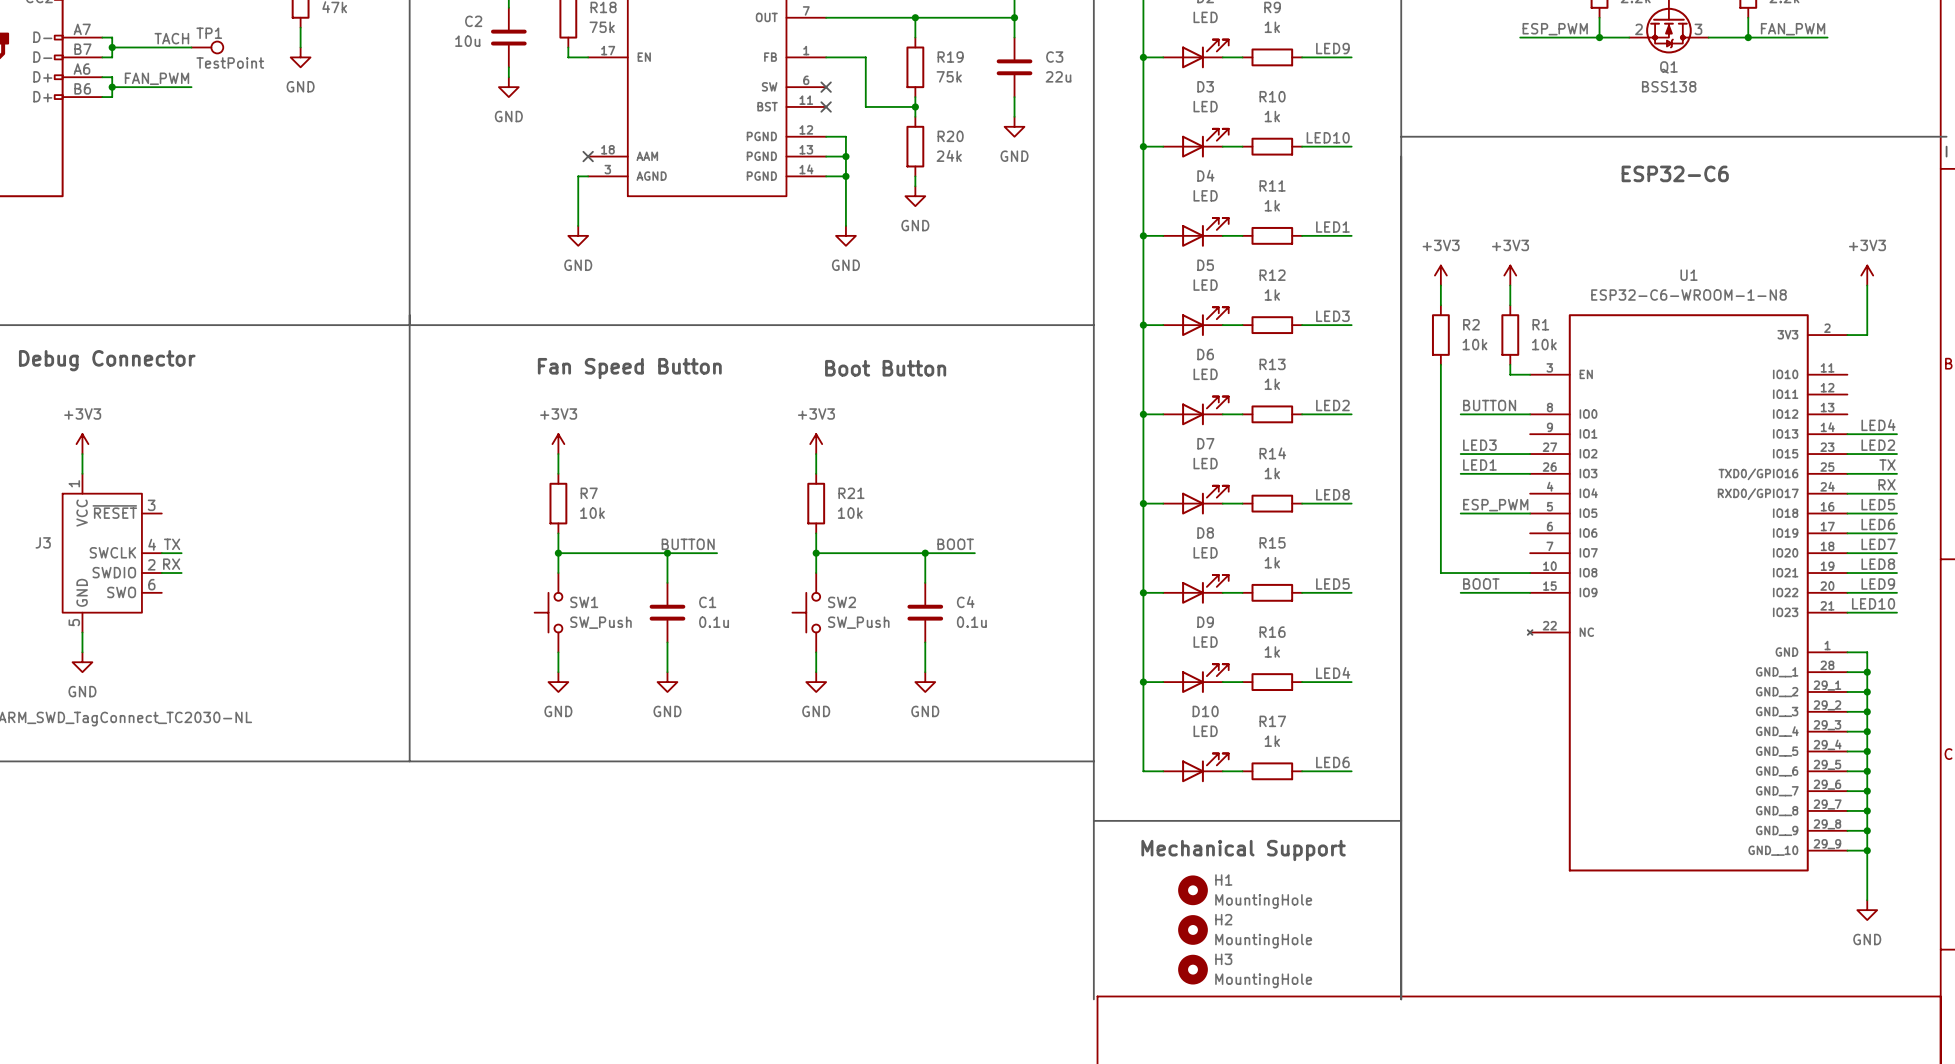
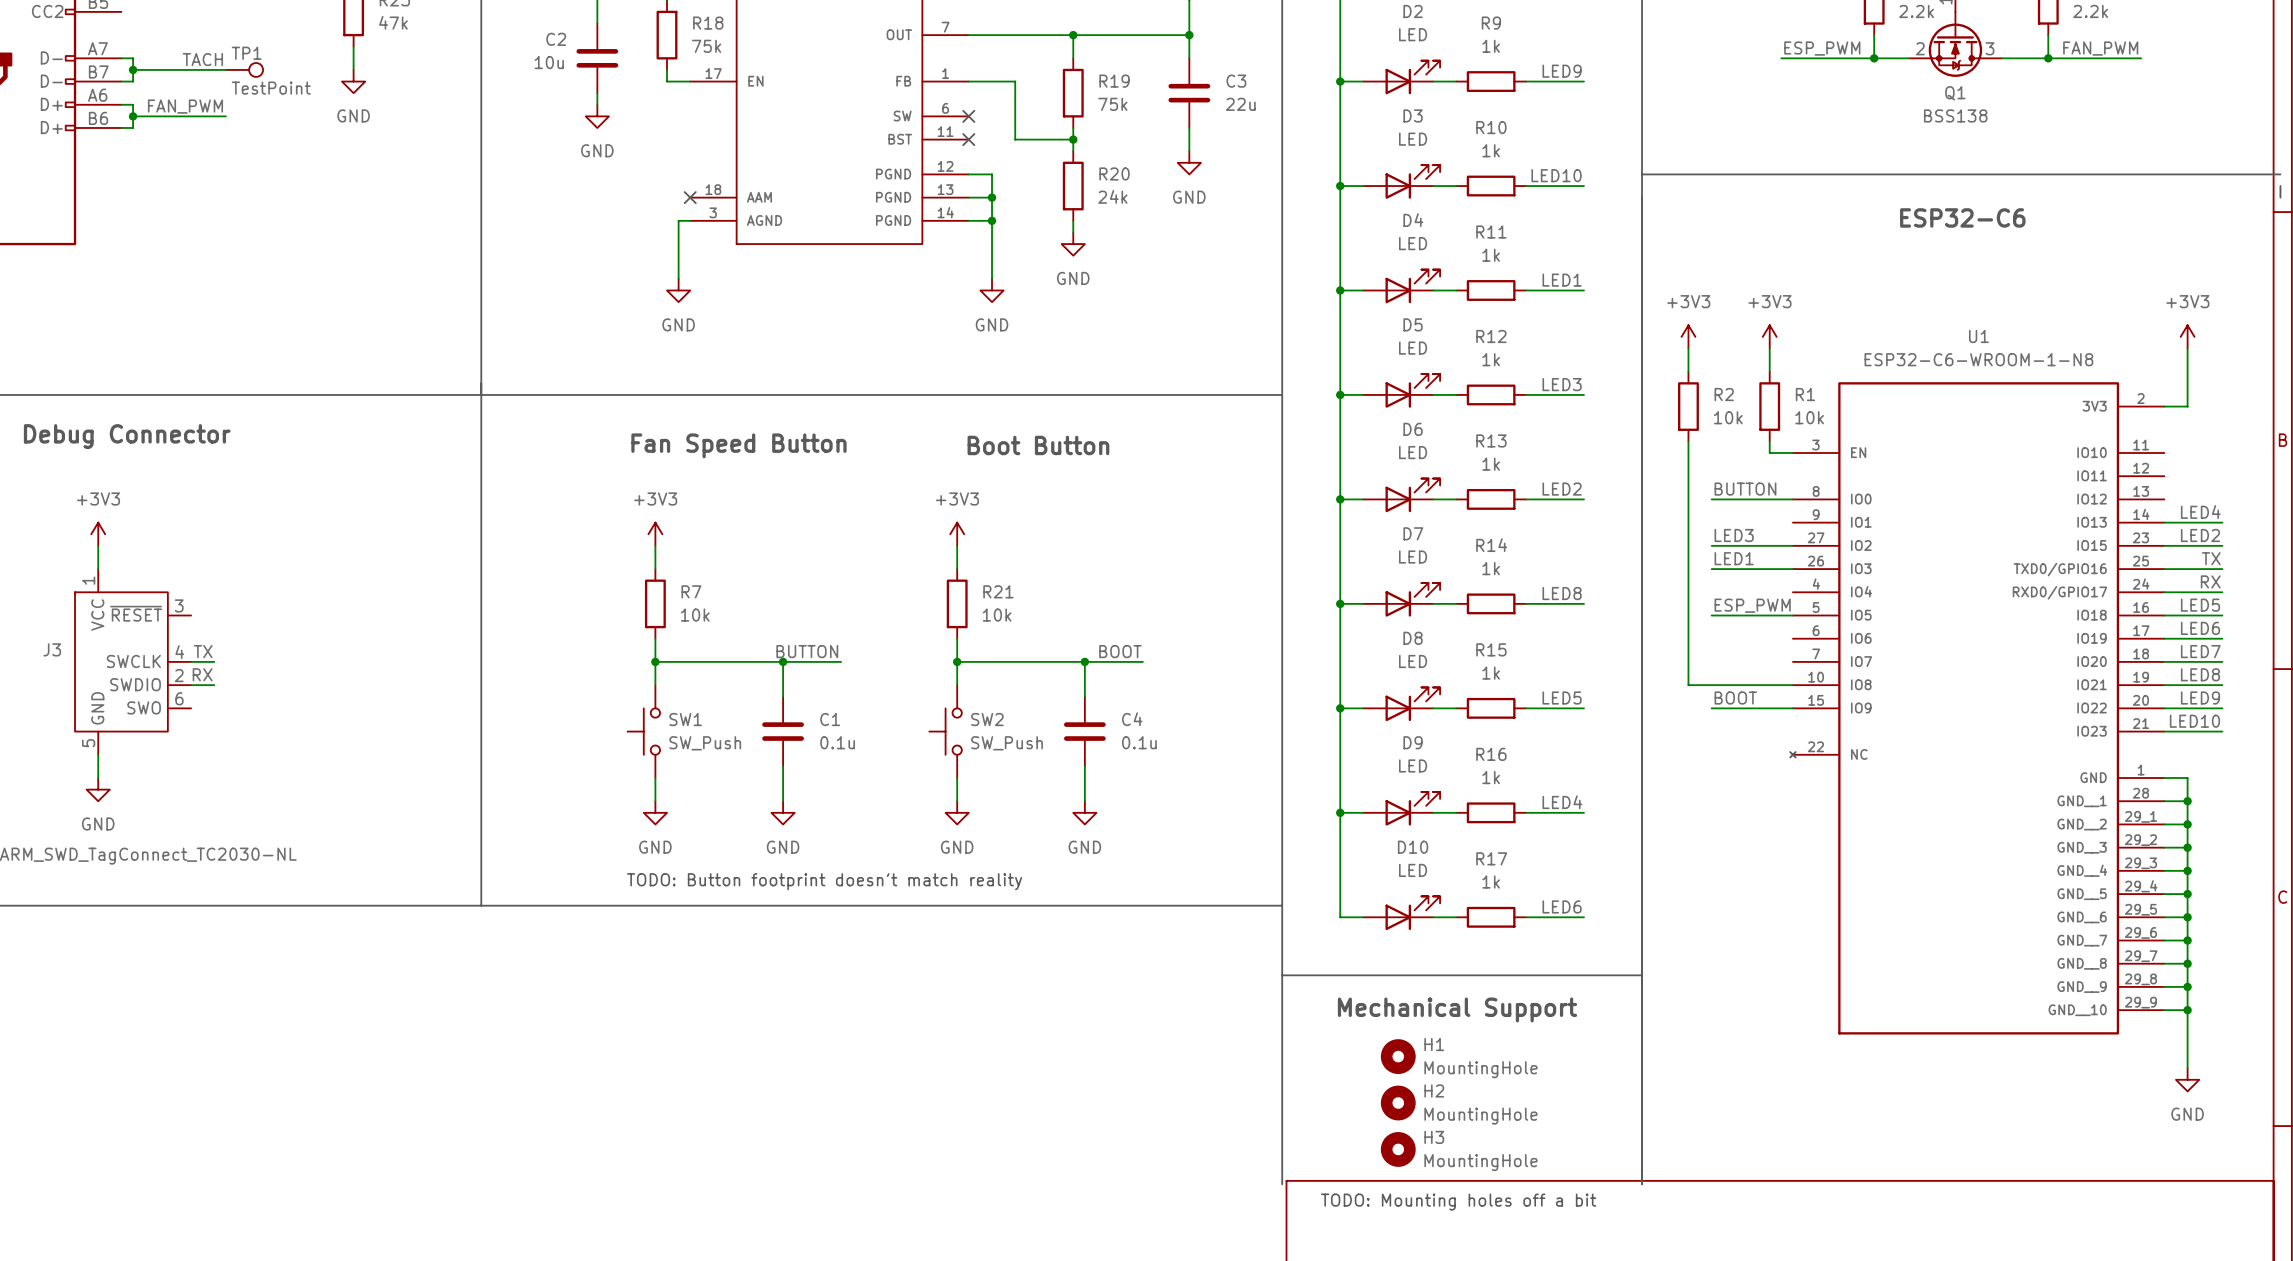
text: none -> TODO: Button footprint doesn't match reality (824, 881)
text: none -> TODO: Mounting holes off a bit (1458, 1202)

